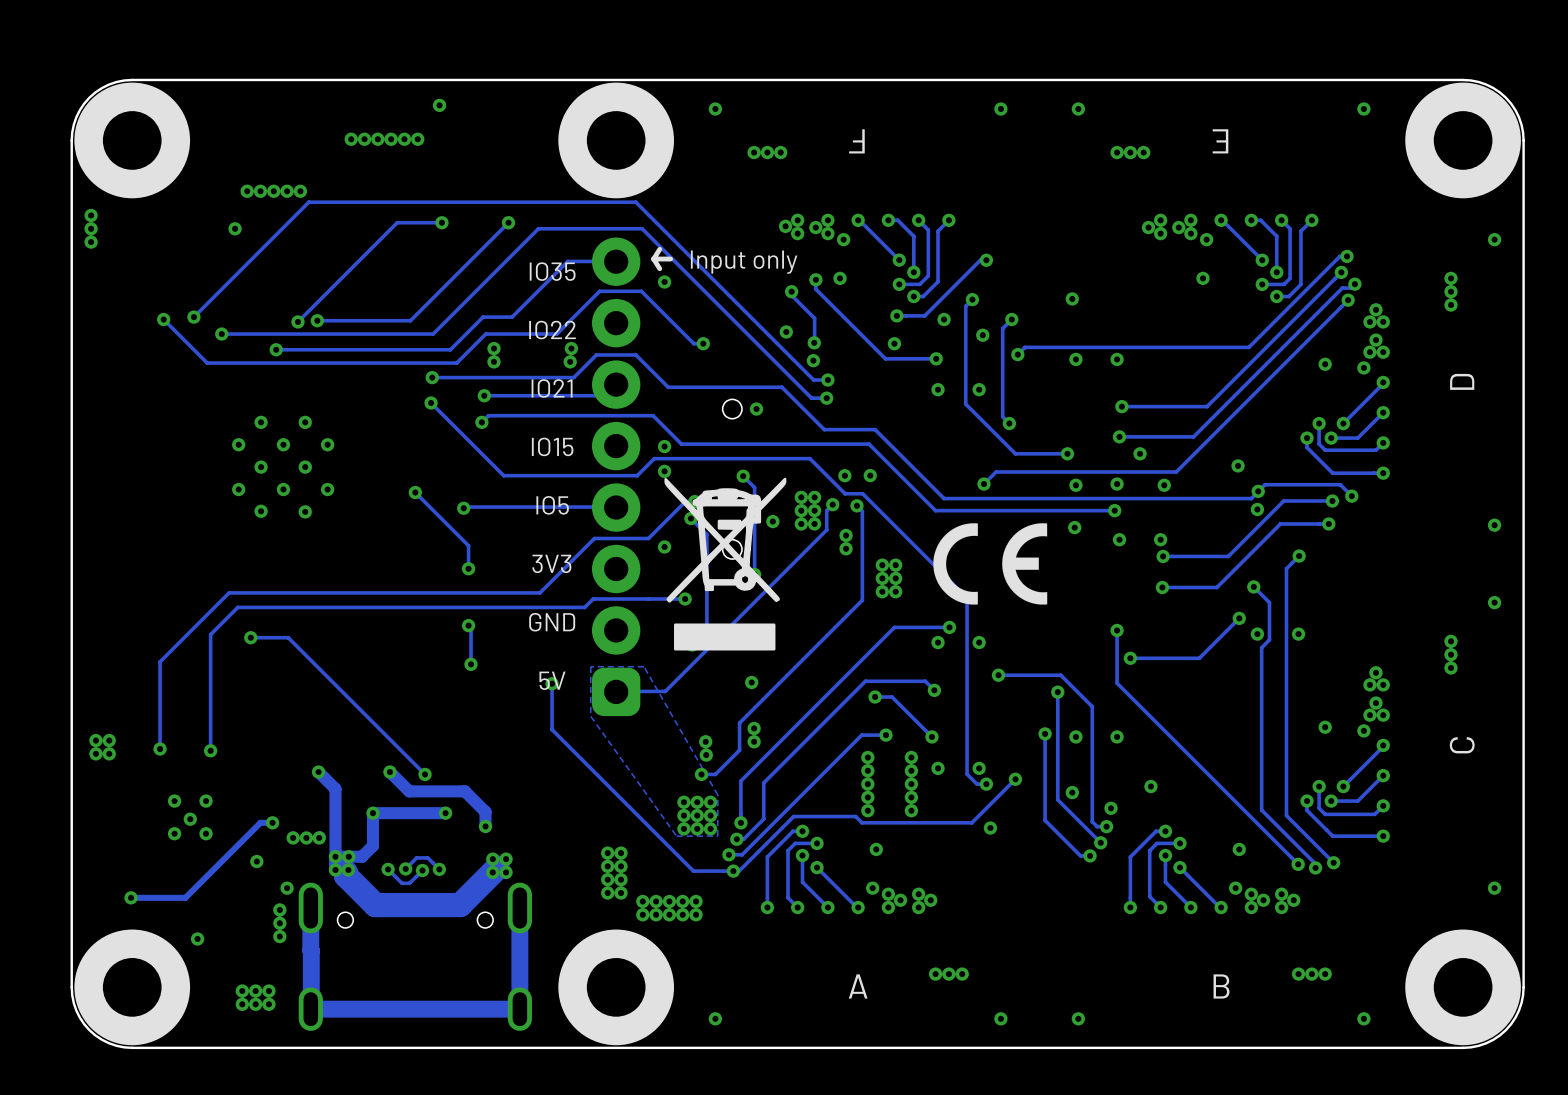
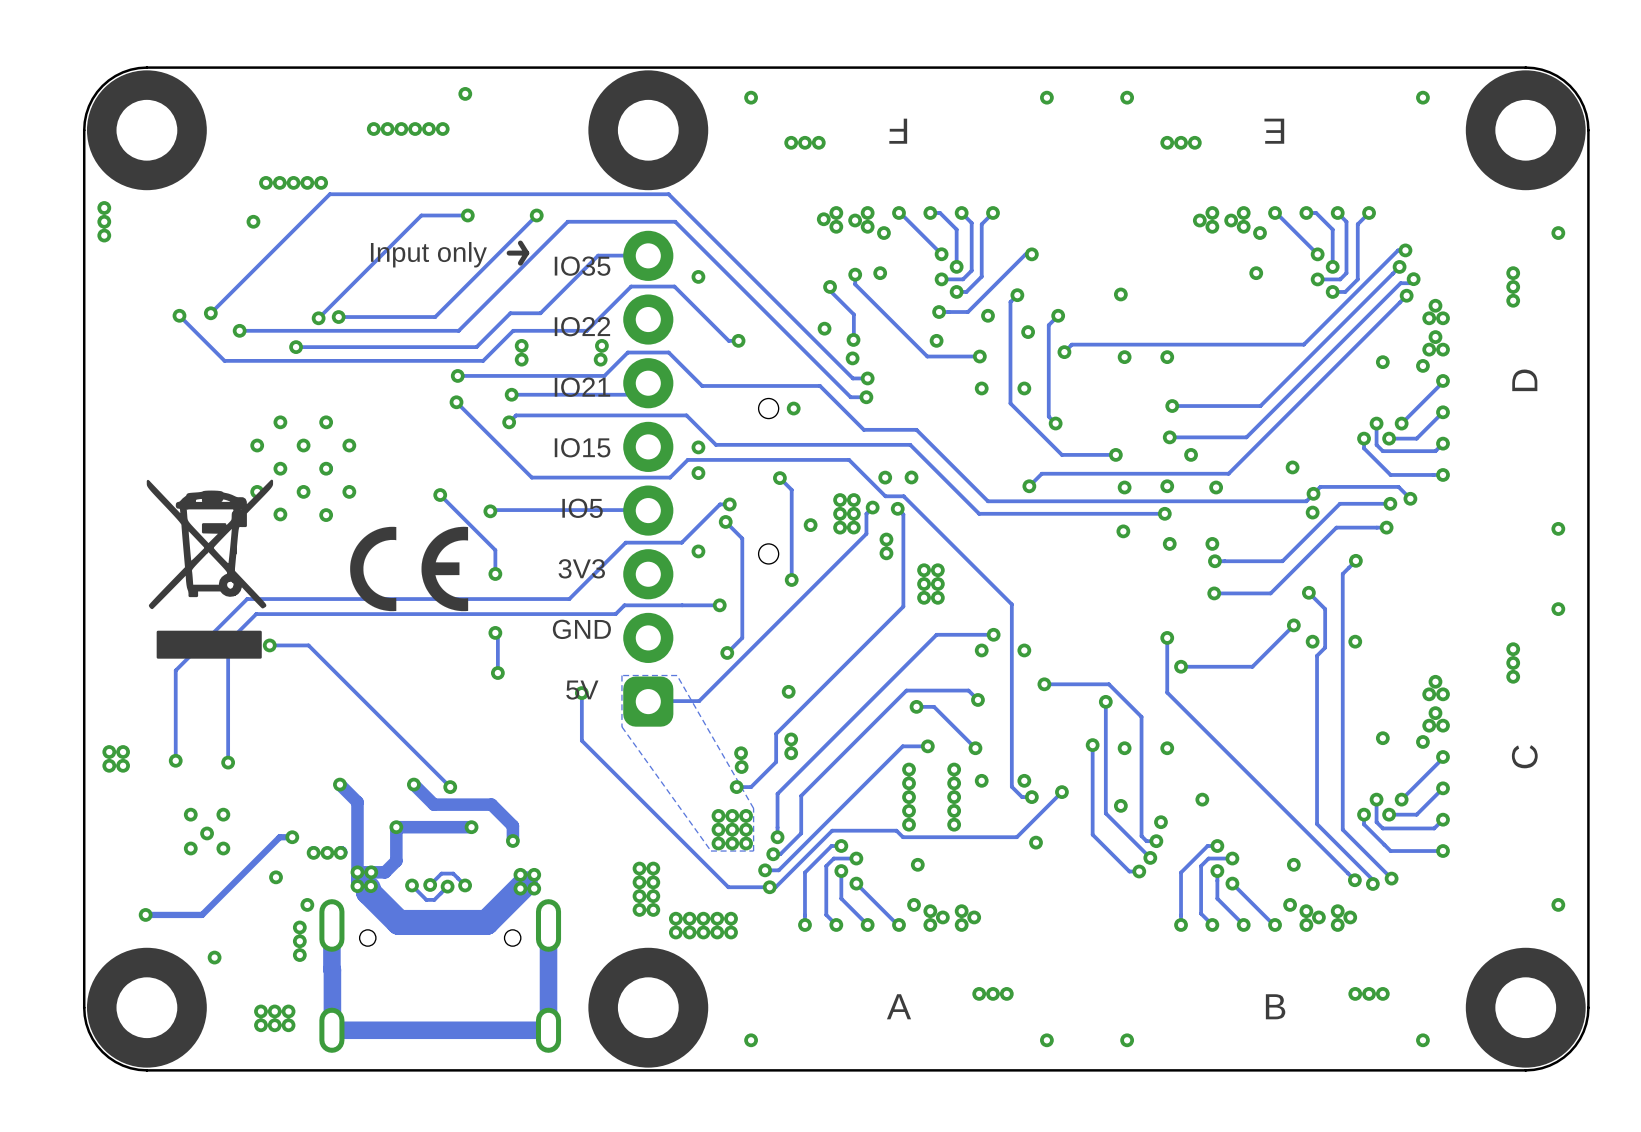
line: (659, 249) (653, 259) -> (526, 253) (520, 263)
line: (653, 259) (659, 268) -> (520, 243) (526, 253)
line: (670, 259) (653, 259) -> (526, 253) (509, 253)
text position: Input only (744, 262) -> Input only (428, 254)
drawing position: (990, 563) -> (409, 568)
drawing position: (725, 564) -> (209, 569)

